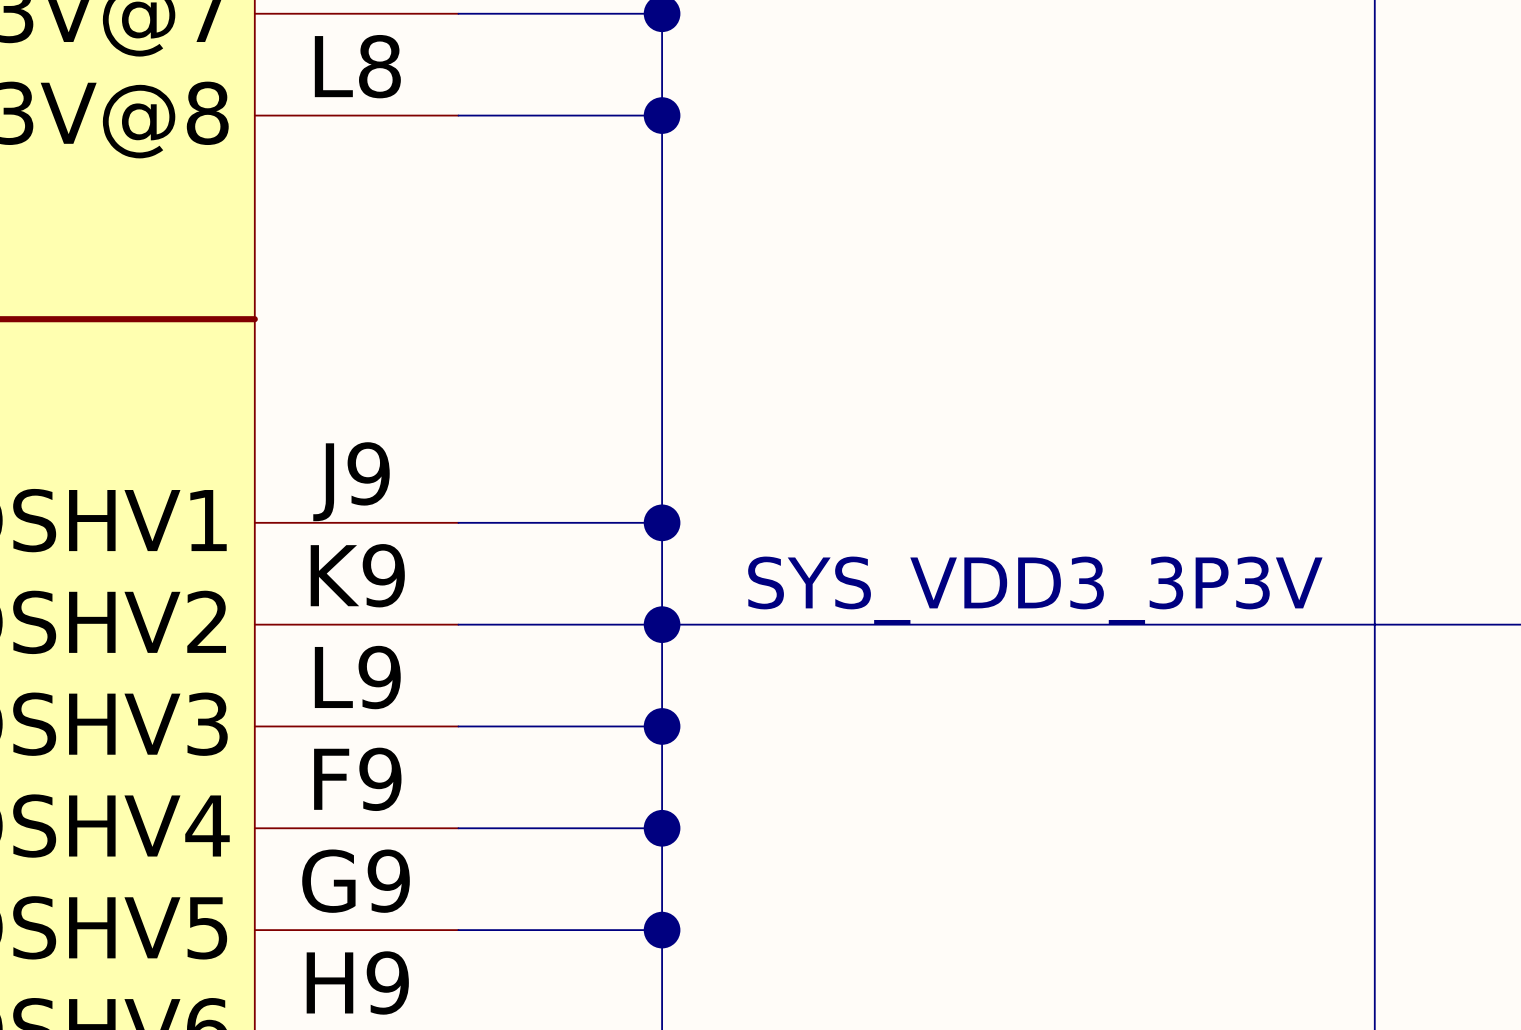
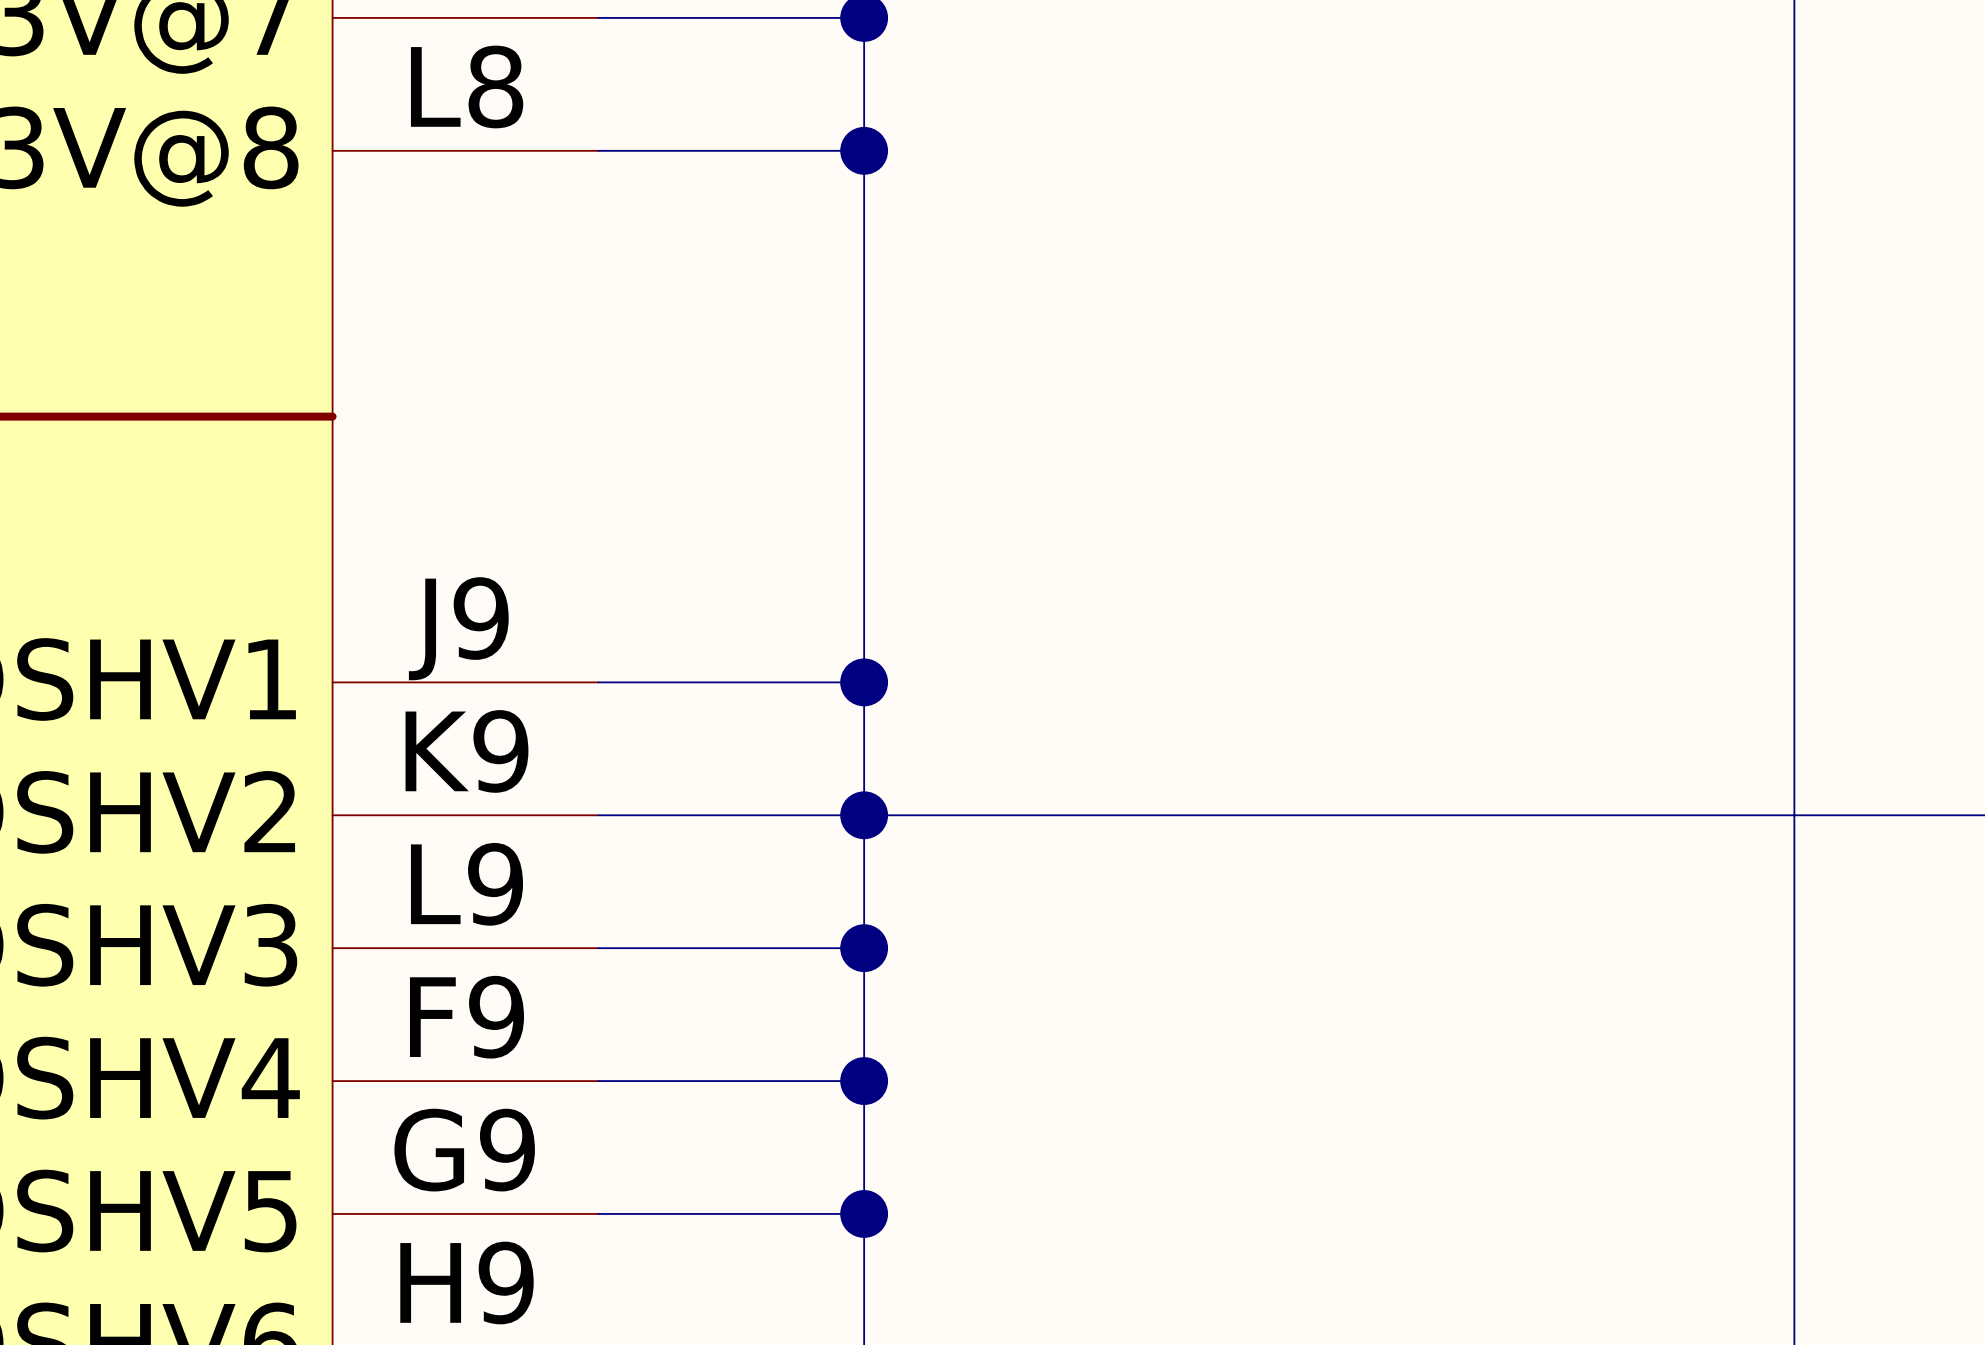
text: SYS_VDD3_3P3V (1035, 590) -> none

